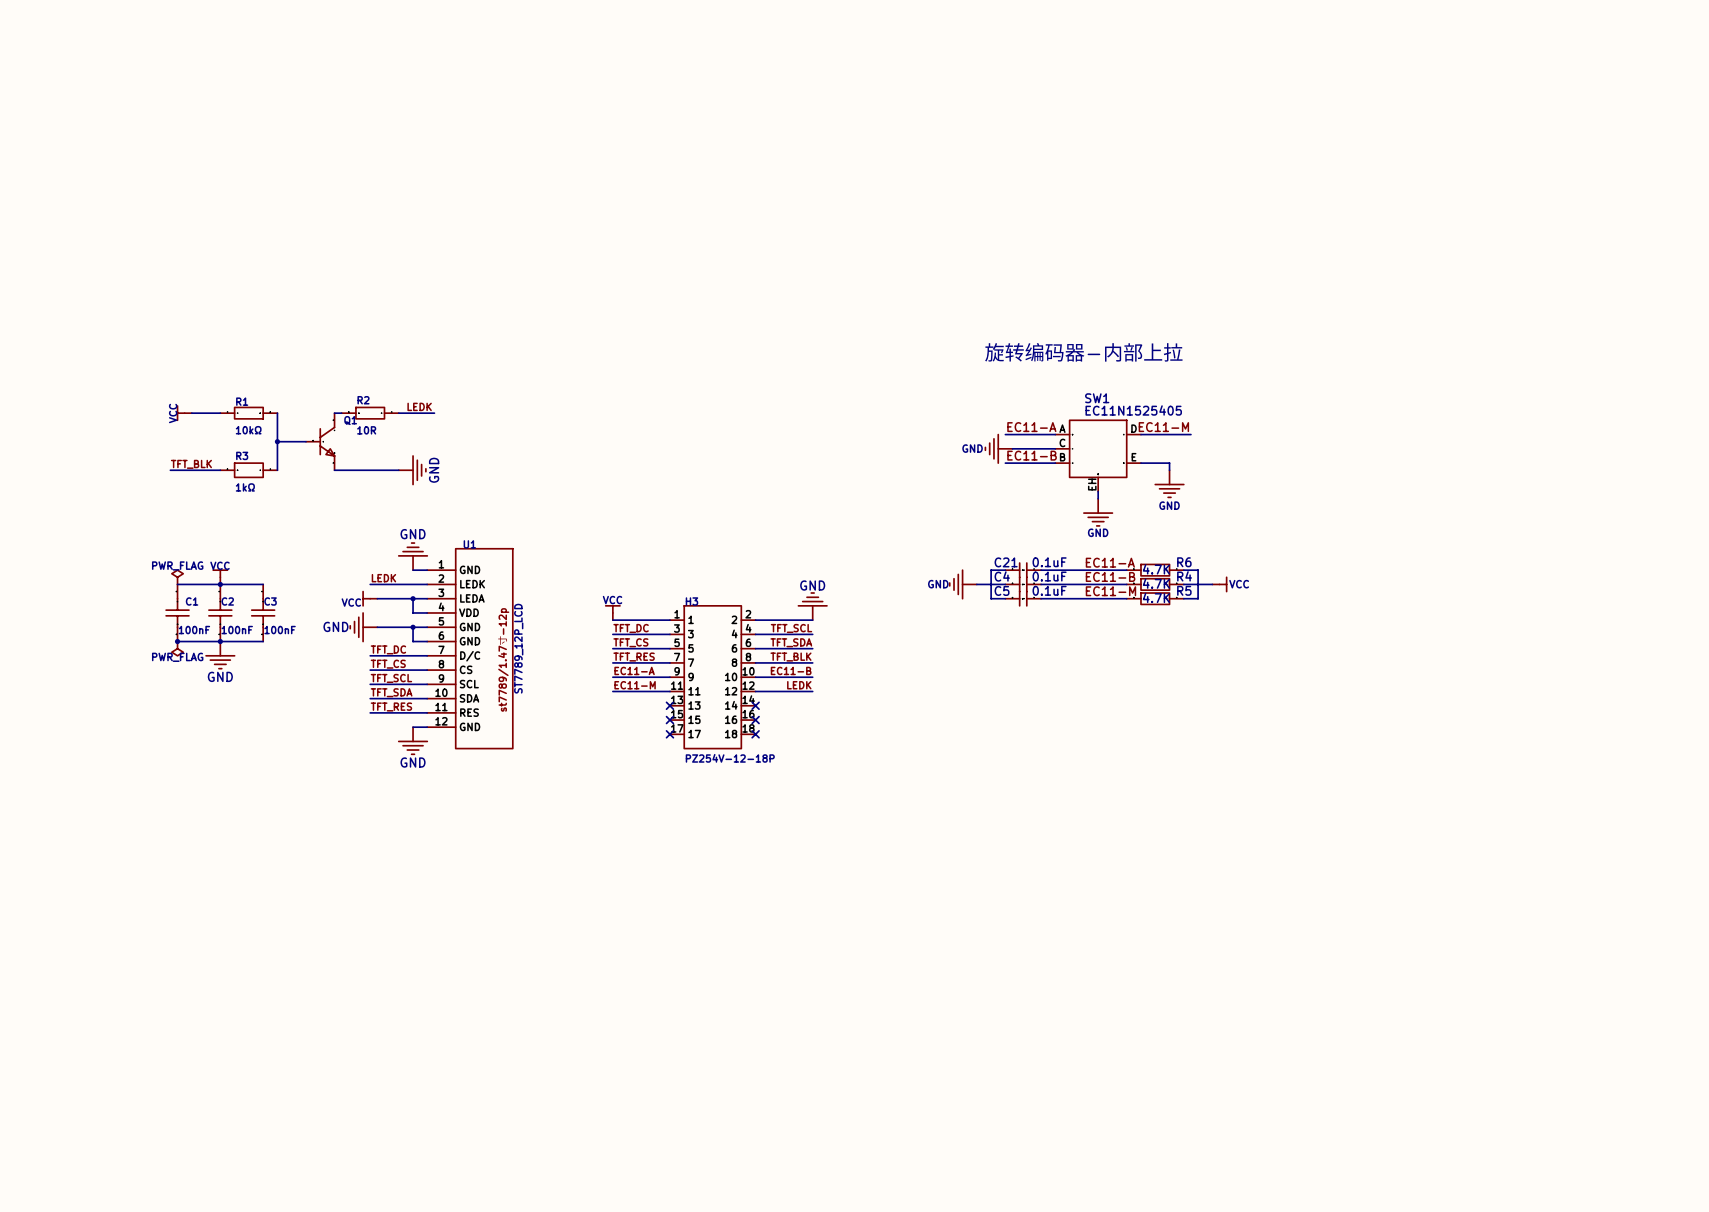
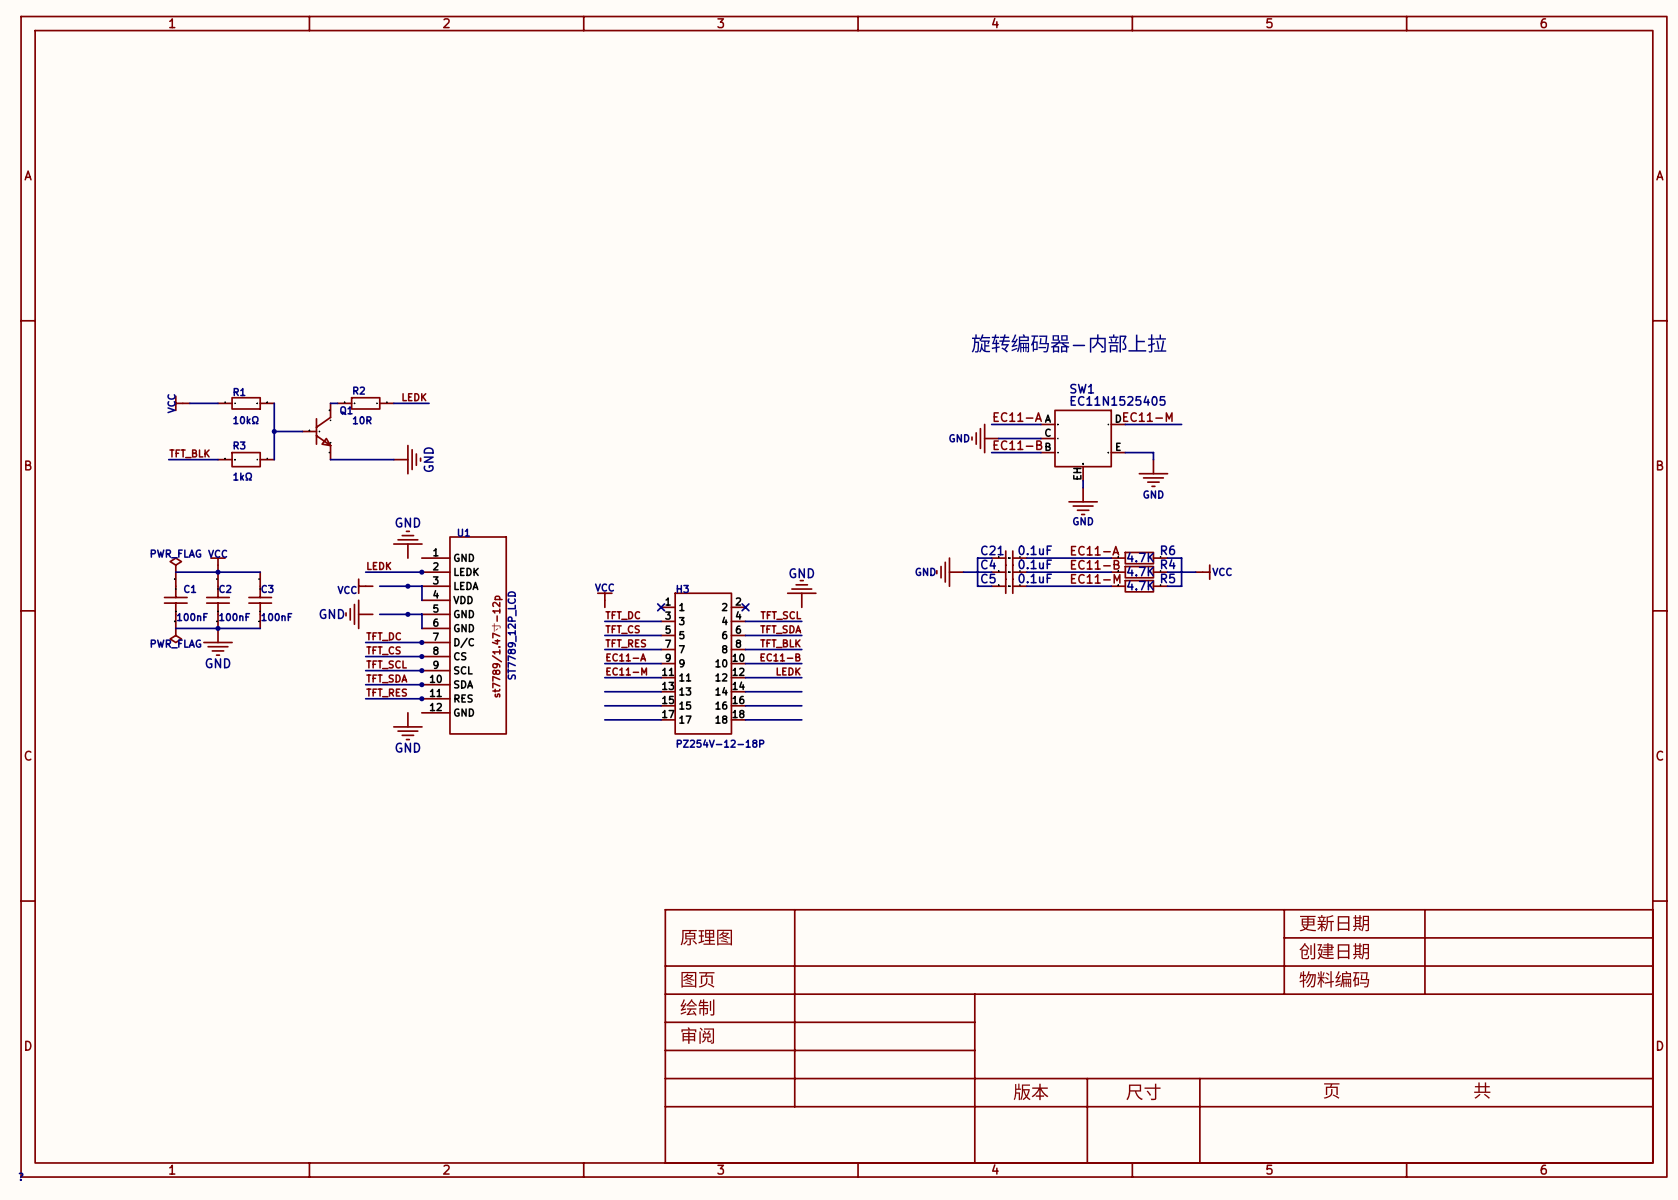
wire: none -> (1174, 424) (1181, 424)
wire: (413, 570) (427, 570) -> none
junction: none -> (421, 572)
wire: (377, 598) (384, 598) -> none
wire: (413, 598) (413, 612) (427, 612) -> (421, 586) (421, 600)
part: none -> (843, 596)
wire: (612, 620) (669, 620) -> (604, 691) (661, 691)
no-connect mark: none -> (661, 607)
wire: (755, 620) (812, 620) -> (745, 691) (801, 691)
no-connect mark: none -> (745, 607)
wire: (377, 627) (384, 627) -> none
wire: (413, 627) (413, 641) (427, 641) -> (421, 614) (421, 628)
junction: (177, 641) -> none
junction: none -> (421, 642)
junction: none -> (421, 656)
junction: none -> (421, 670)
junction: none -> (421, 684)
no-connect mark: (669, 705) -> none
no-connect mark: (755, 705) -> none
junction: none -> (421, 698)
wire: none -> (604, 705) (661, 705)
no-connect mark: (669, 720) -> none
wire: none -> (745, 705) (801, 705)
no-connect mark: (755, 720) -> none
wire: (413, 727) (427, 727) -> none
wire: none -> (604, 719) (661, 719)
no-connect mark: (669, 734) -> none
wire: none -> (745, 719) (801, 719)
no-connect mark: (755, 734) -> none

